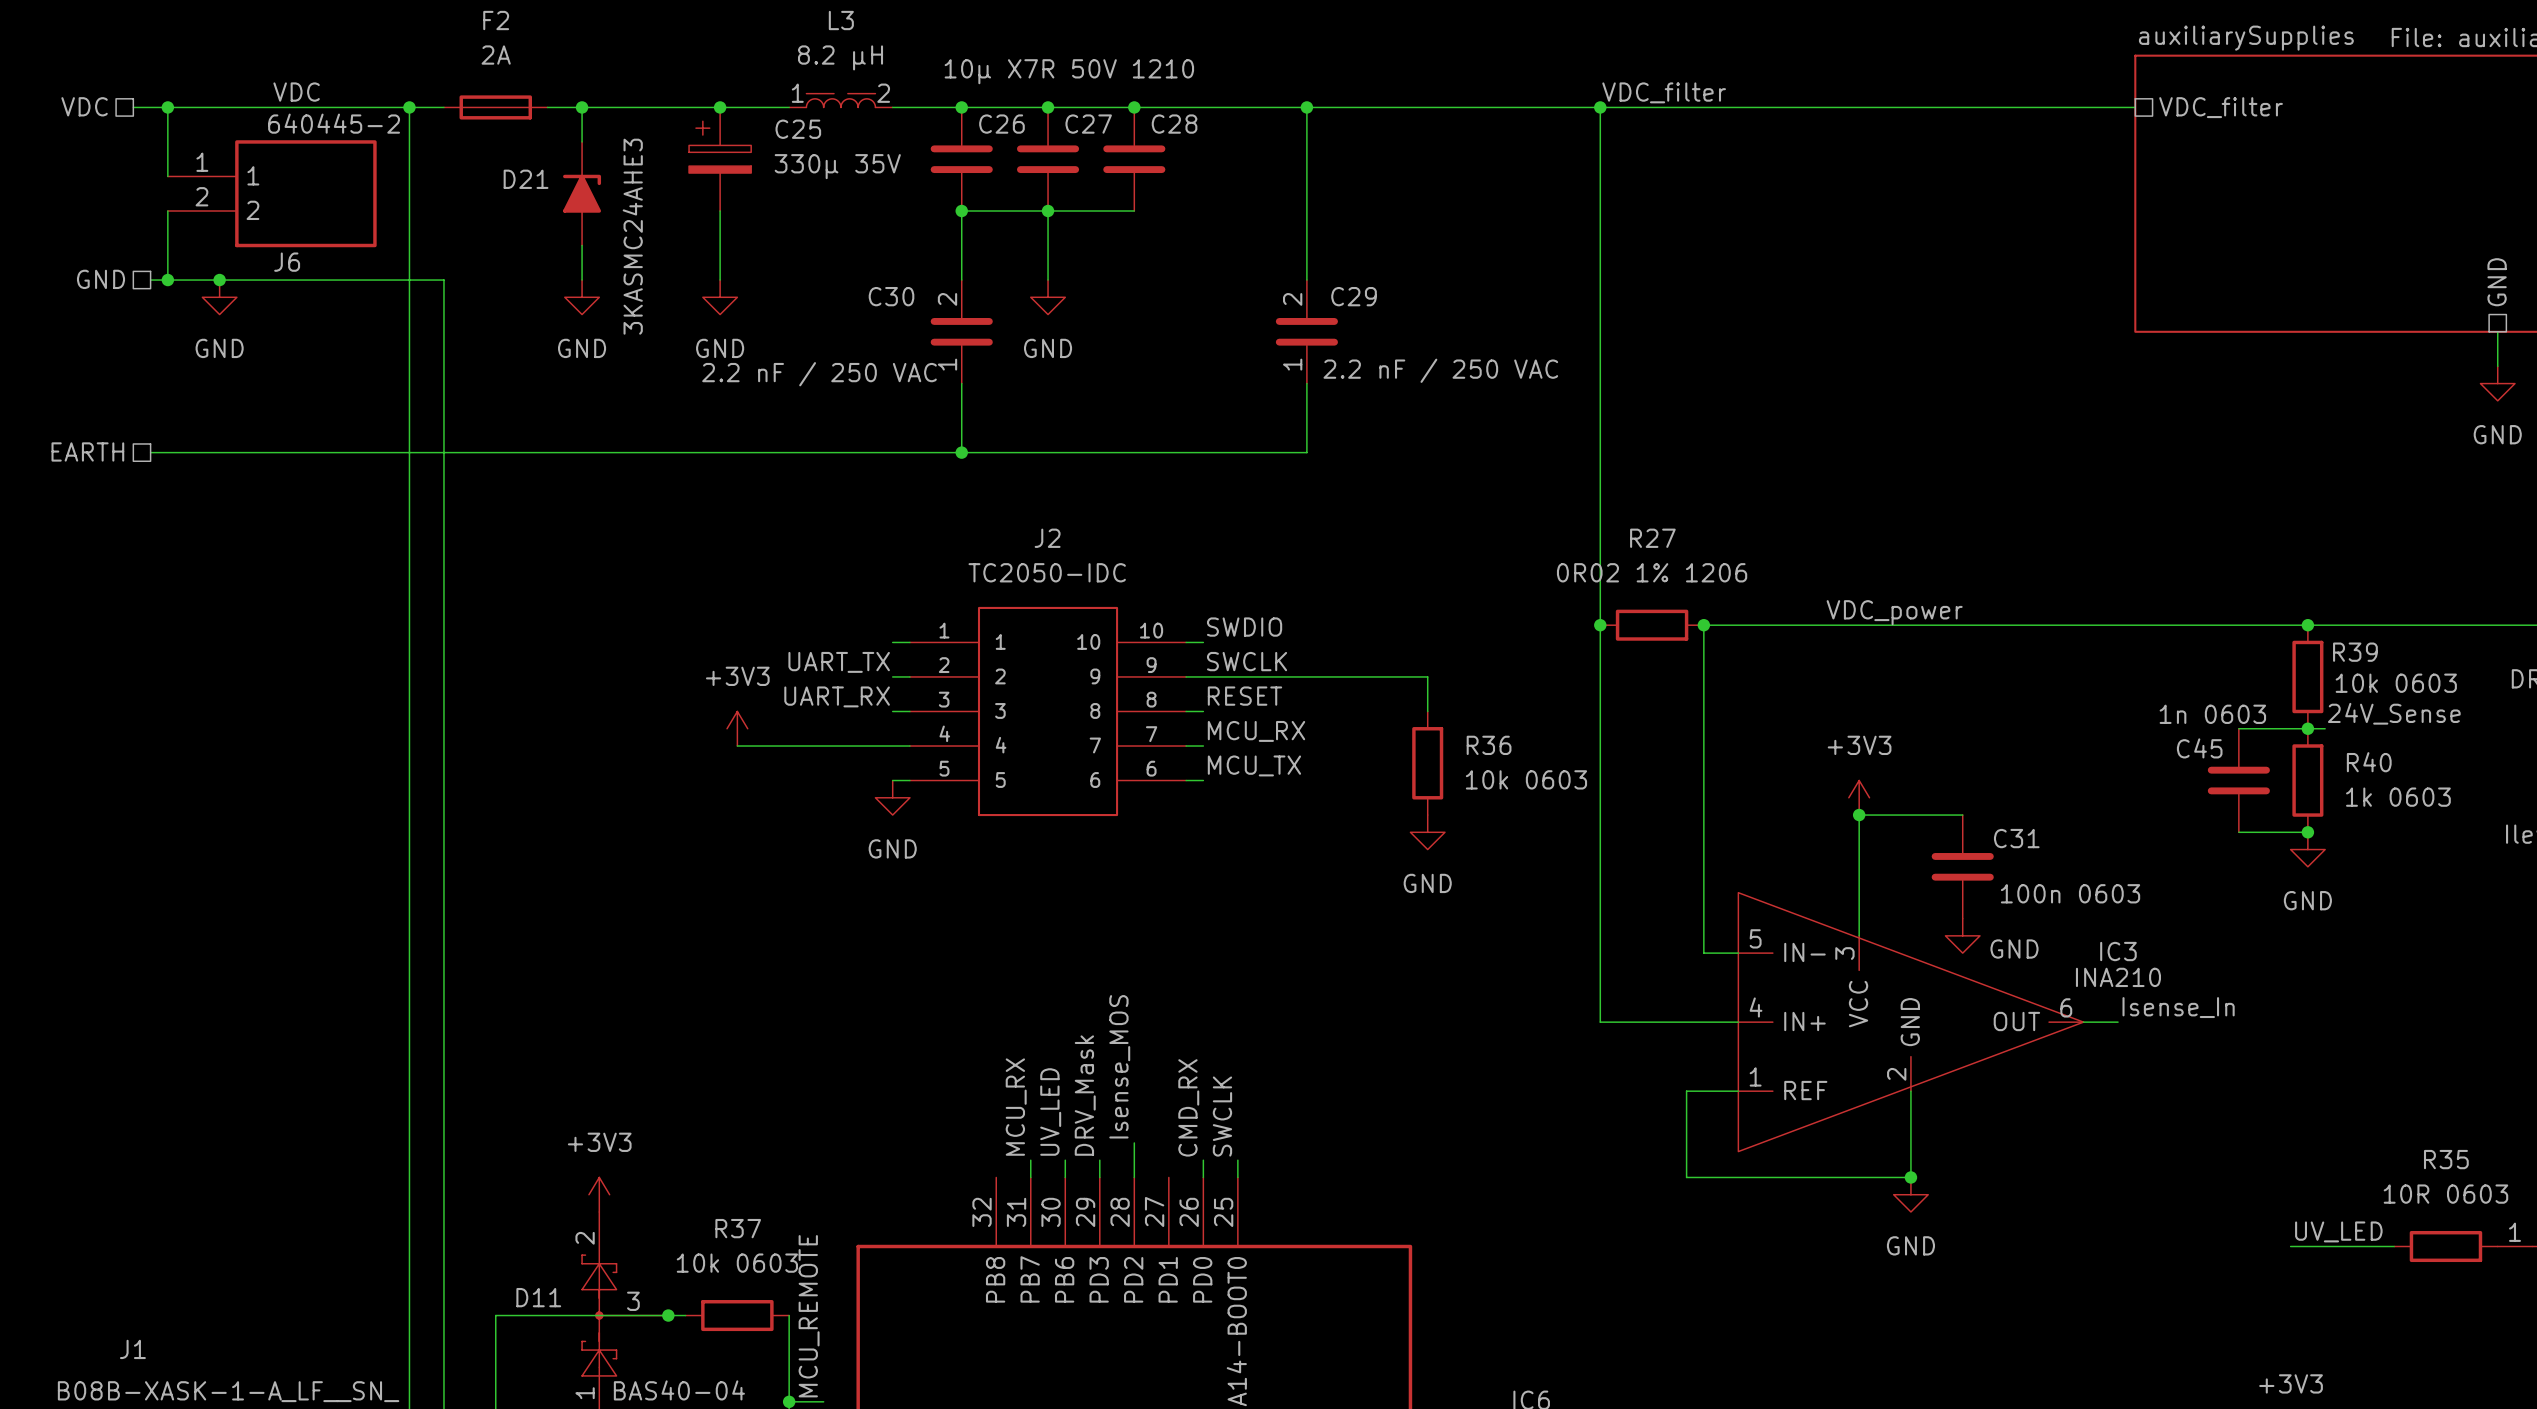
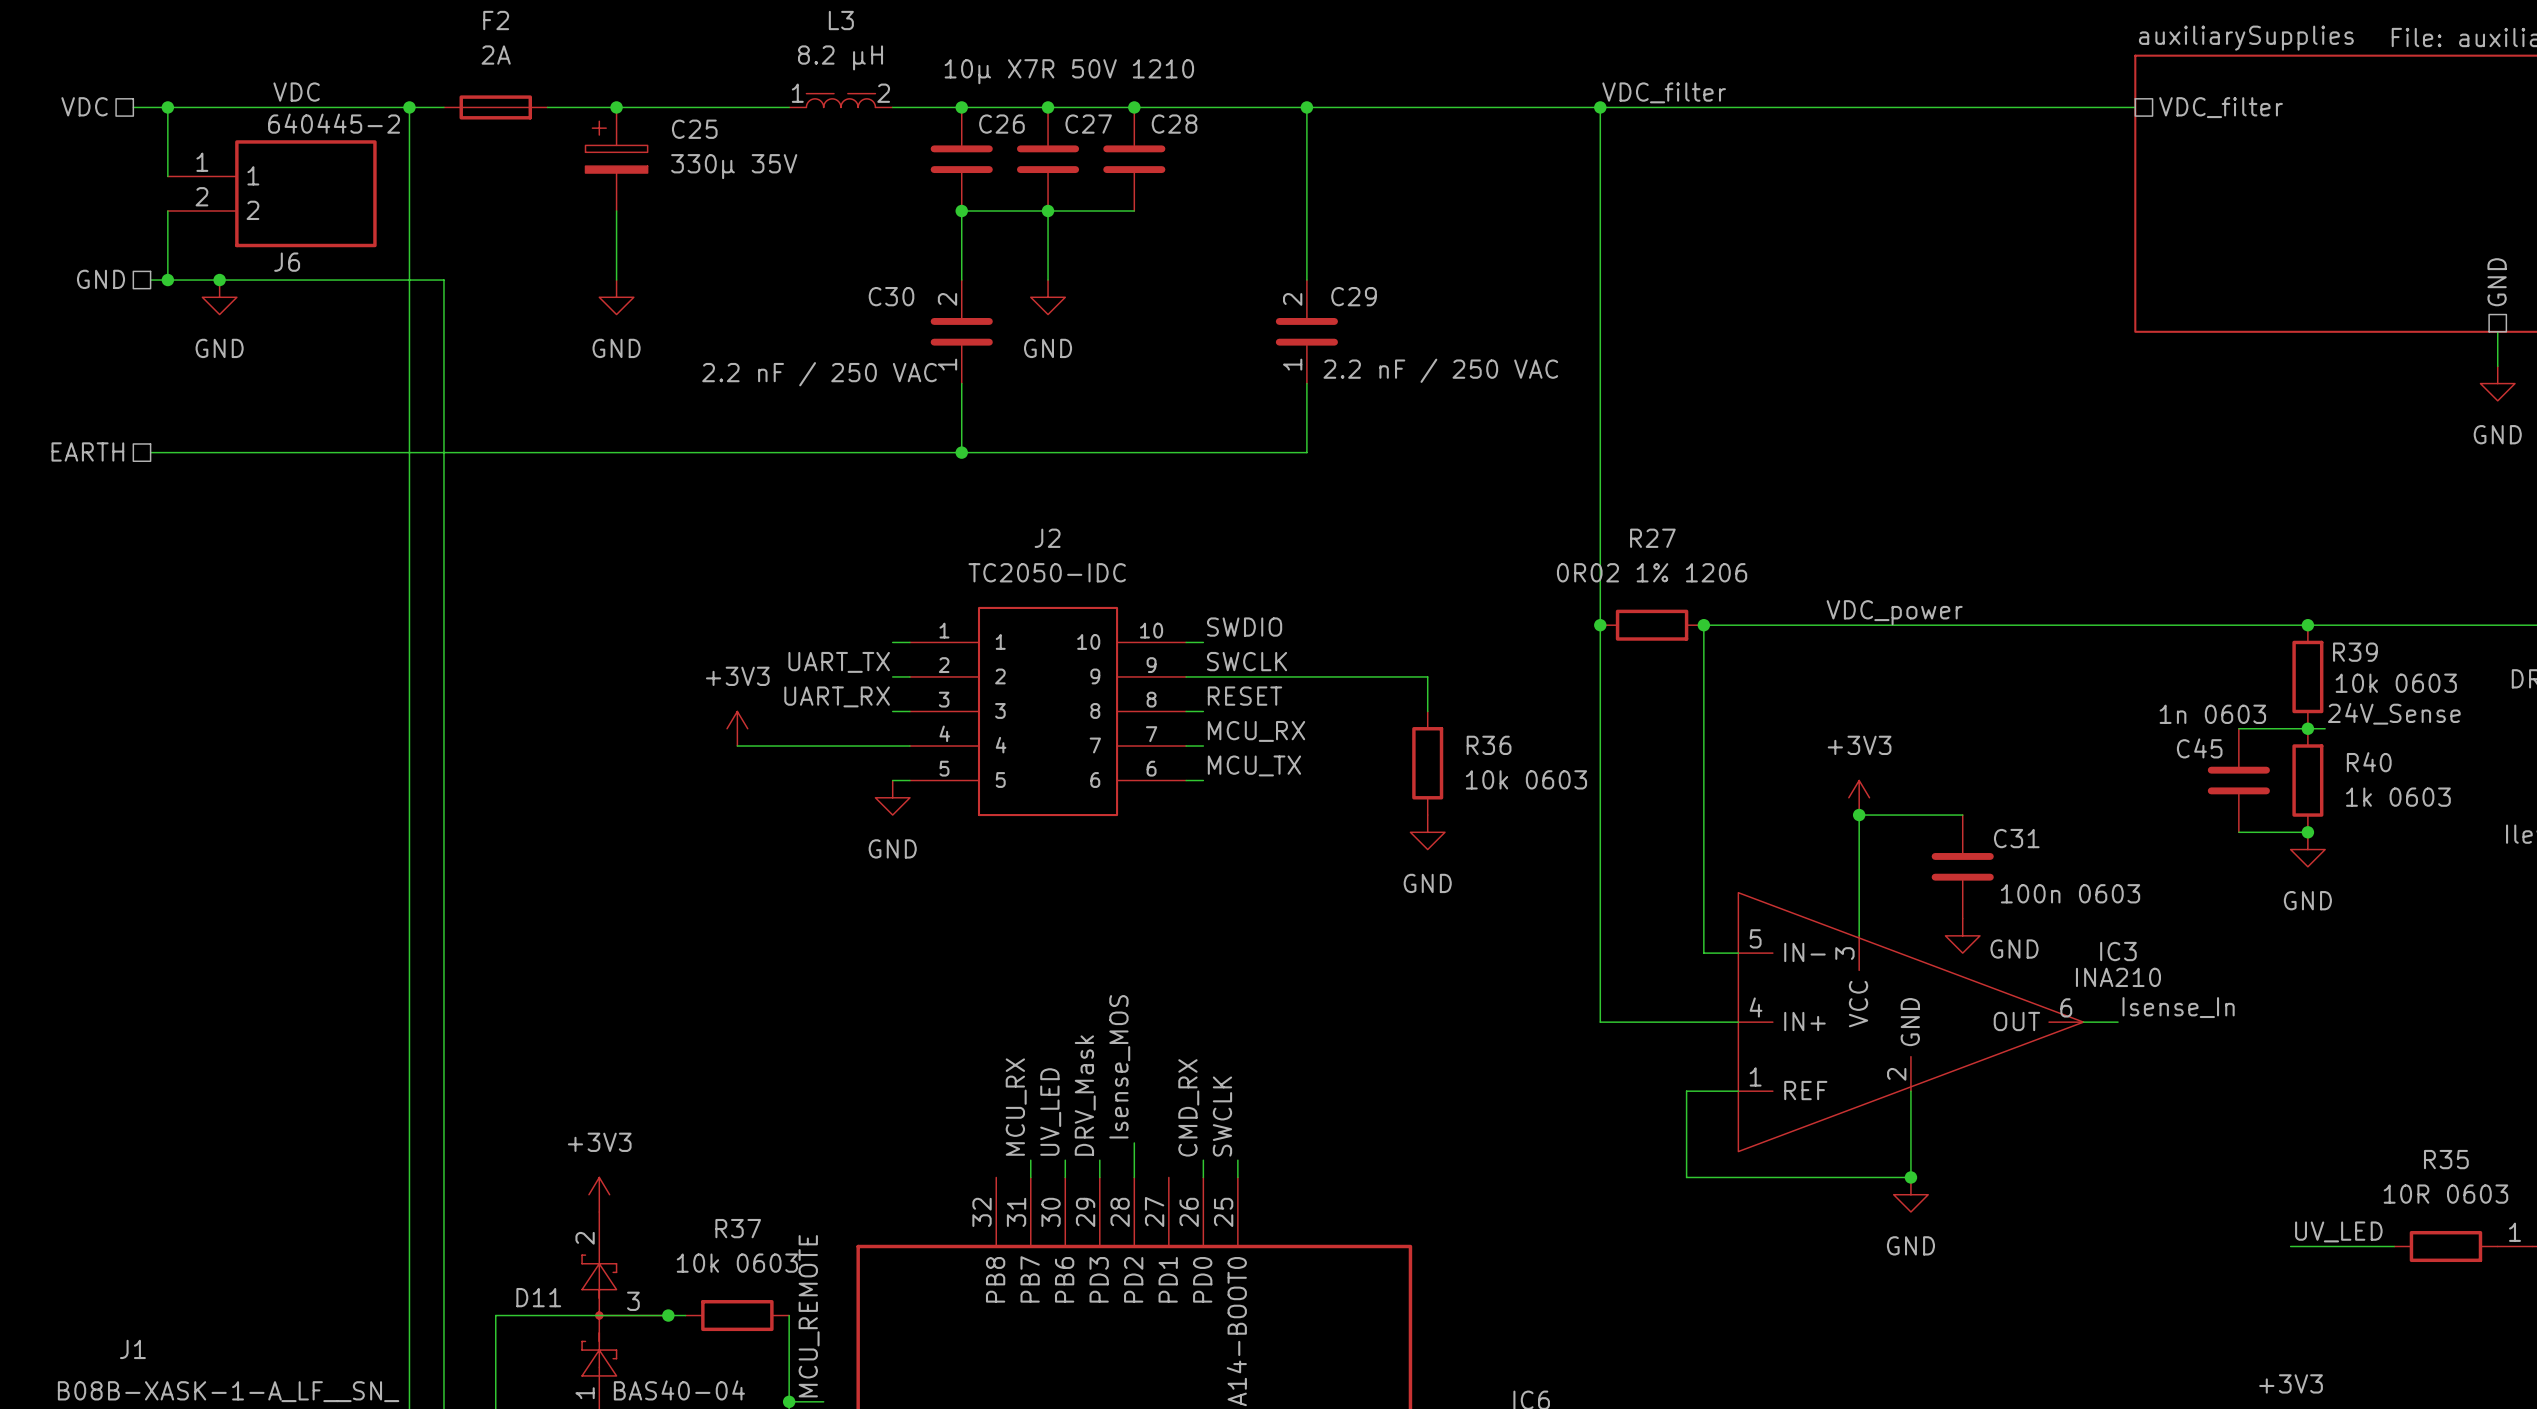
wire: (582, 107) (582, 141) -> none
junction position: (582, 107) -> (616, 107)
junction: (720, 107) -> none
C25 position: (720, 159) -> (616, 159)
D21: 3KASMC24AHE3 (582, 193) -> none
wire: (720, 210) (720, 280) -> (616, 210) (616, 280)
wire: (582, 245) (582, 280) -> none
power symbol position: GND (582, 297) -> GND (616, 297)
power symbol: GND (720, 297) -> none

